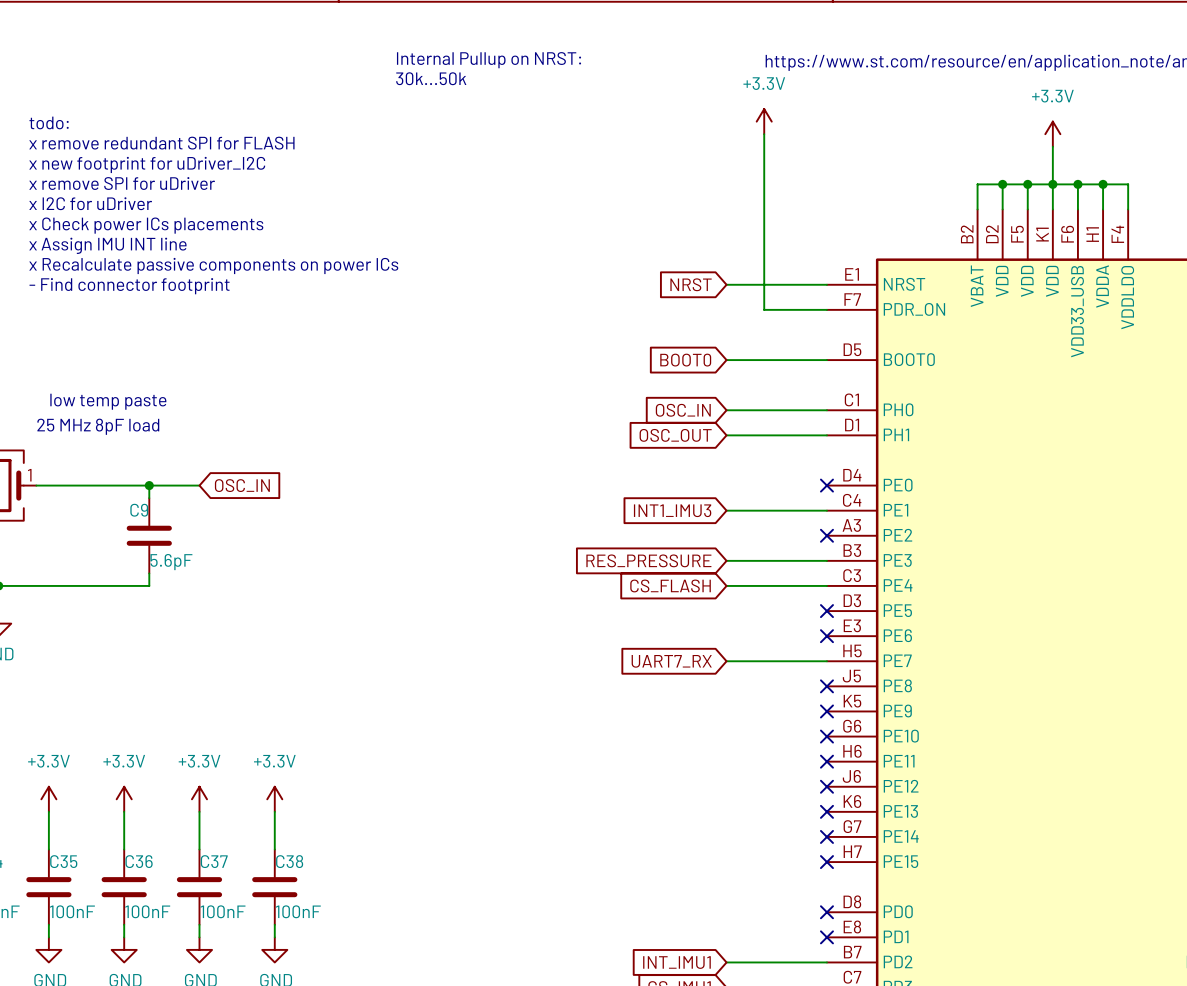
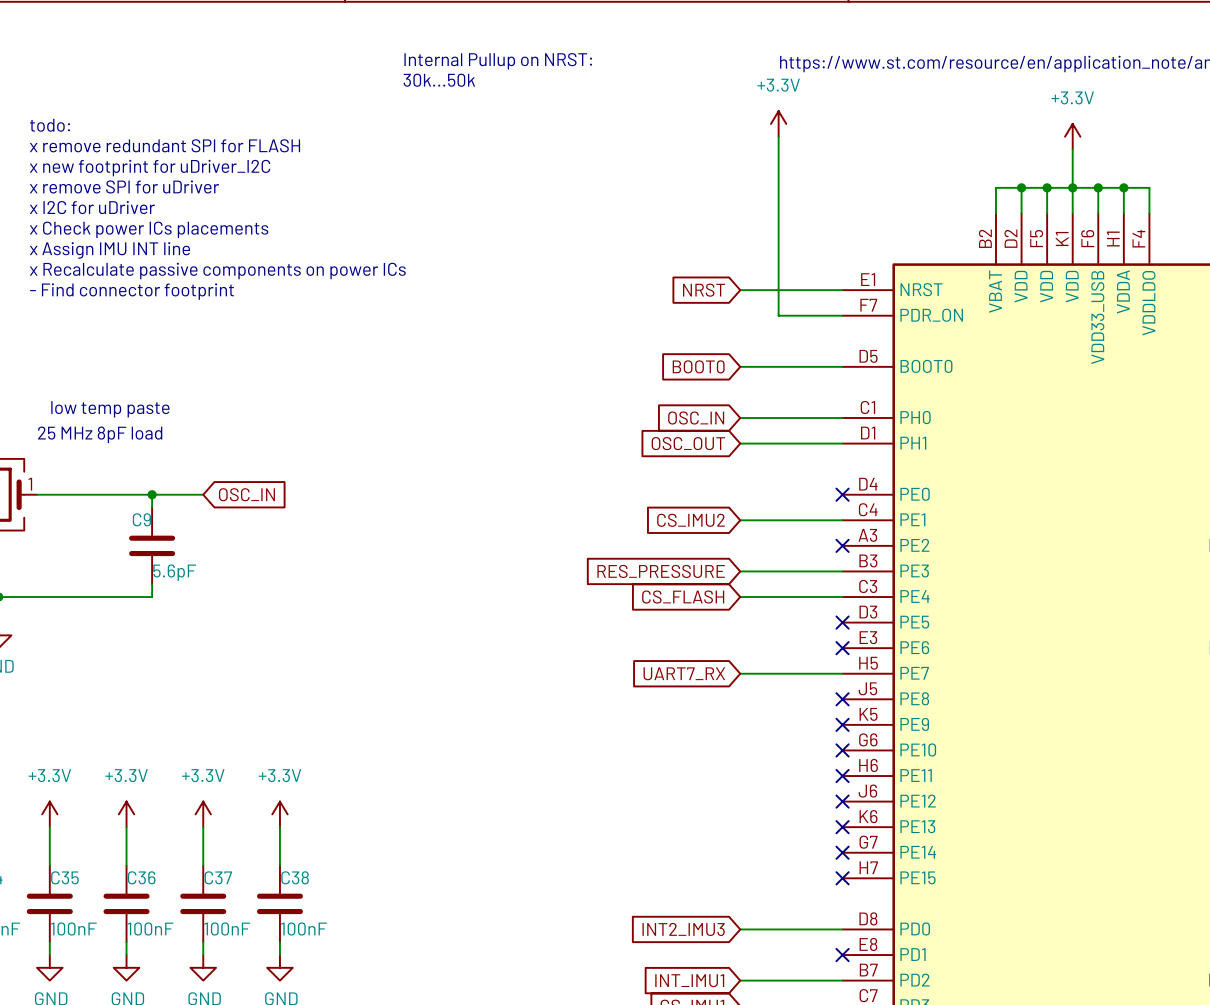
global label: INT1_IMU3 (672, 510) -> CS_IMU2 (691, 520)
global label: none -> INT2_IMU3 (683, 929)
wire: none -> (740, 929) (842, 929)
no-connect mark: (826, 912) -> none

